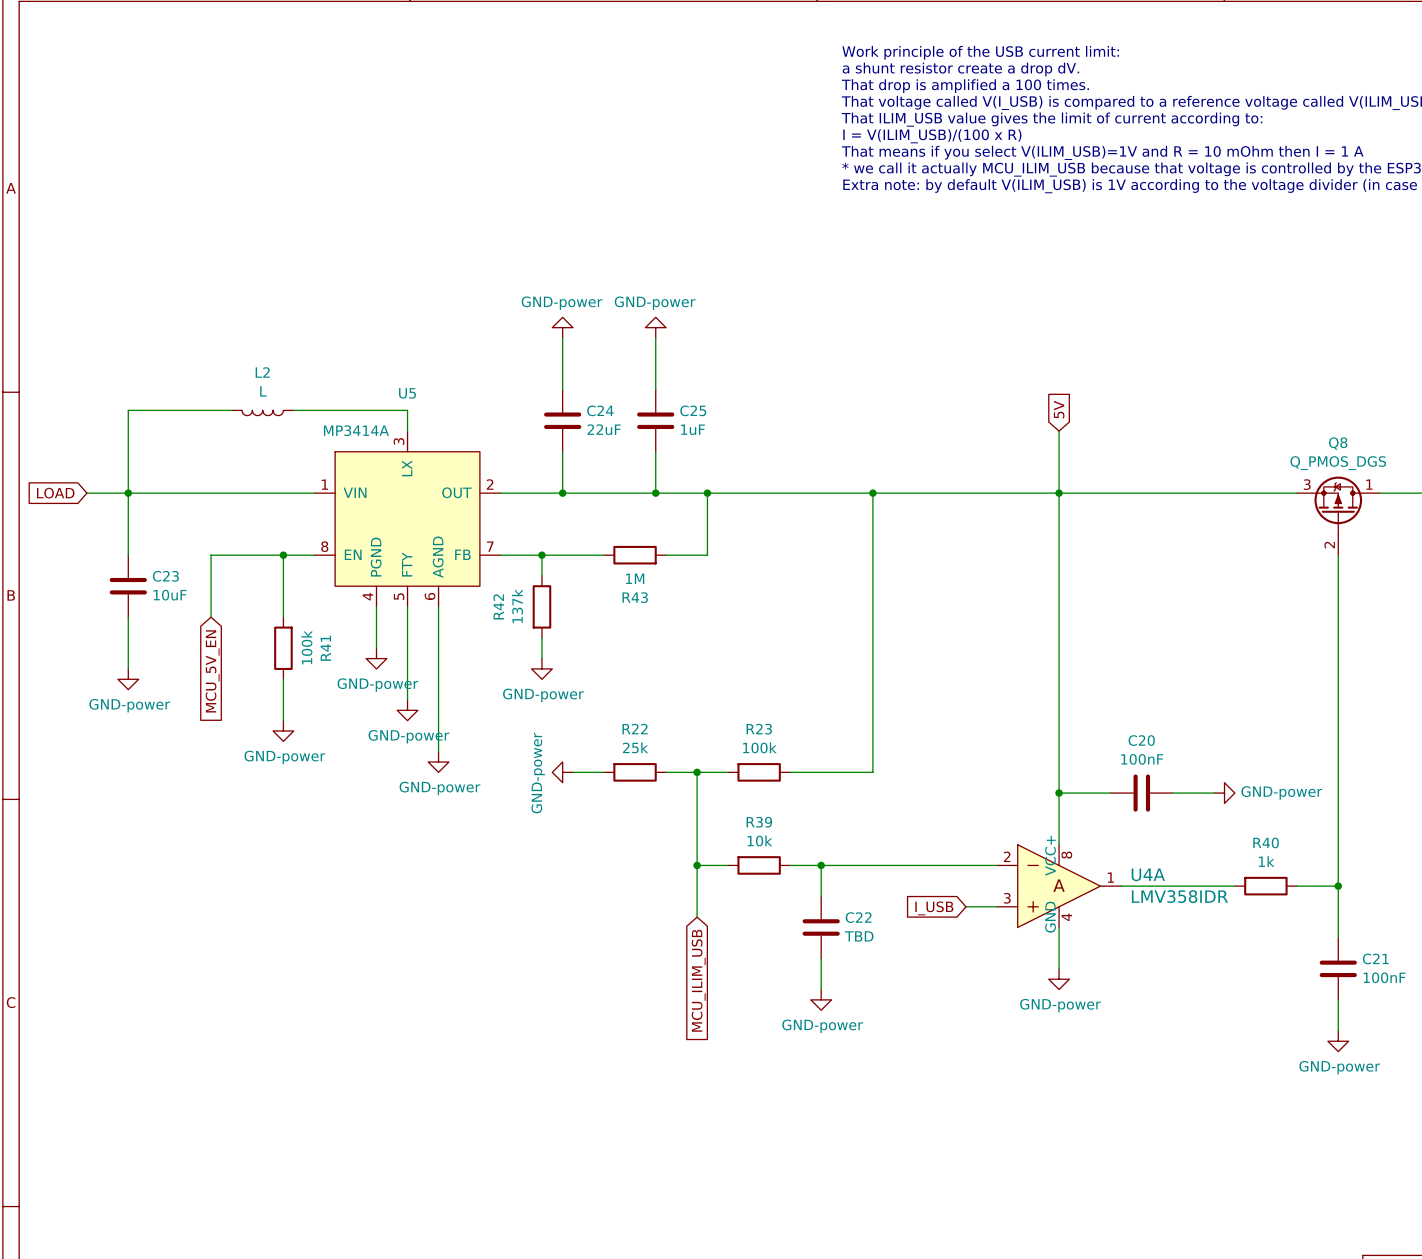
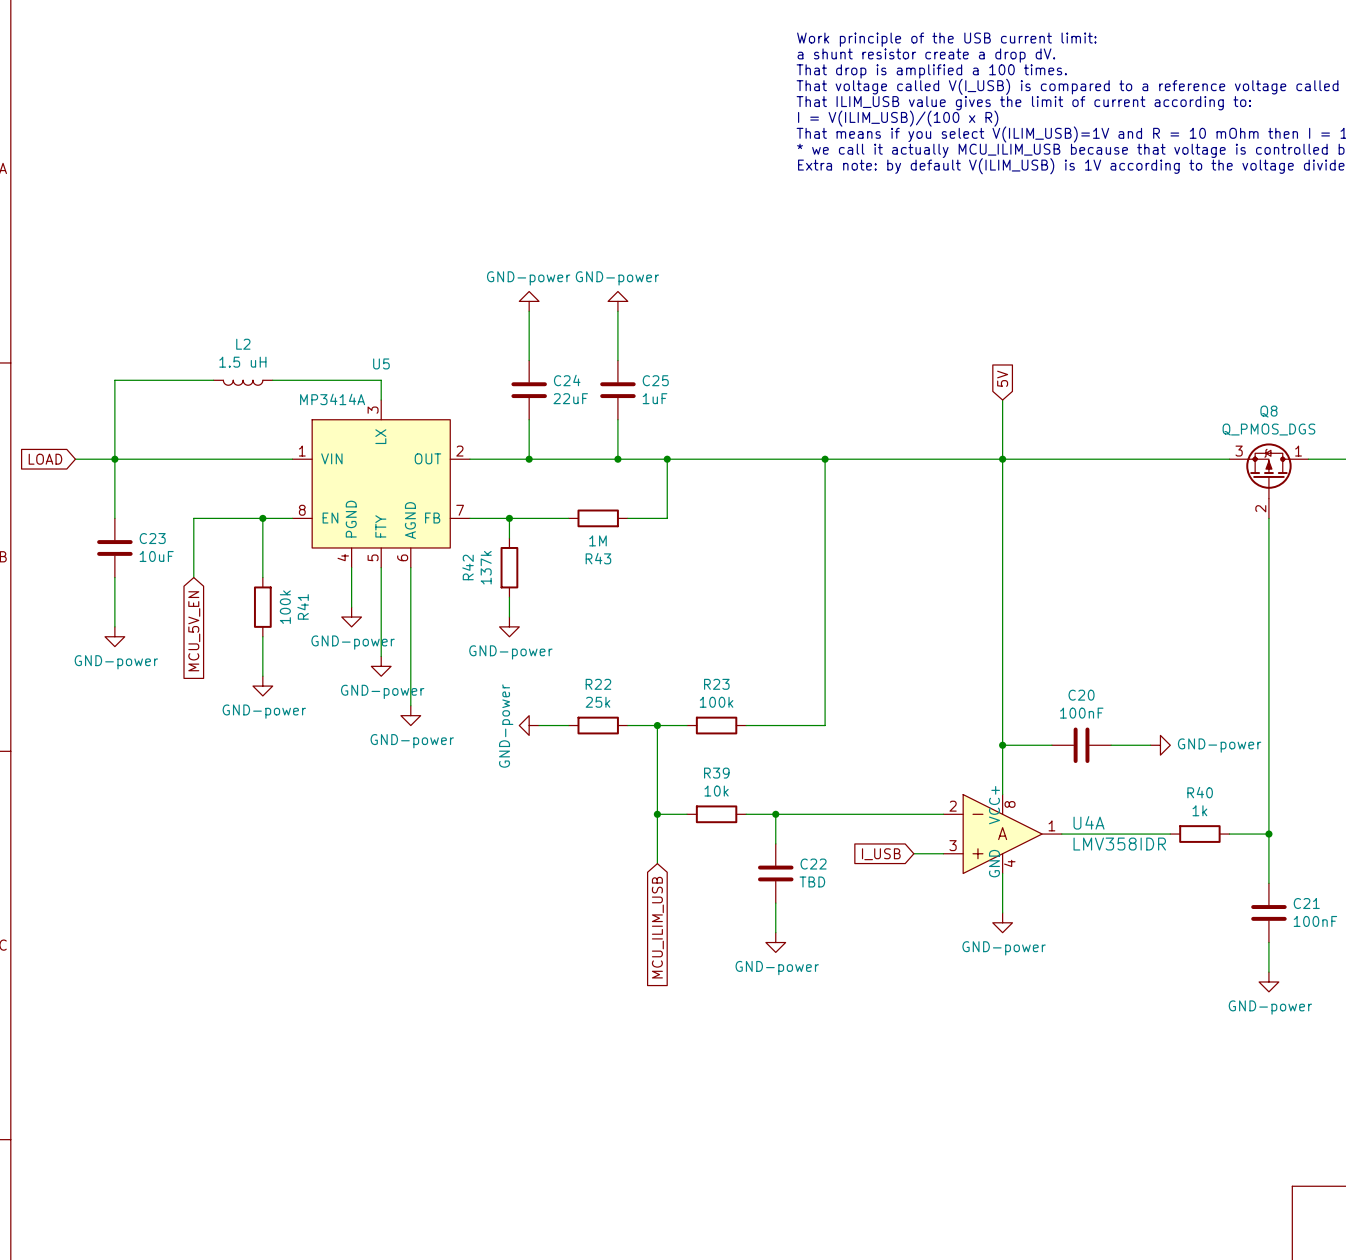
L2 value: L (263, 391) -> 1.5 uH (242, 362)

